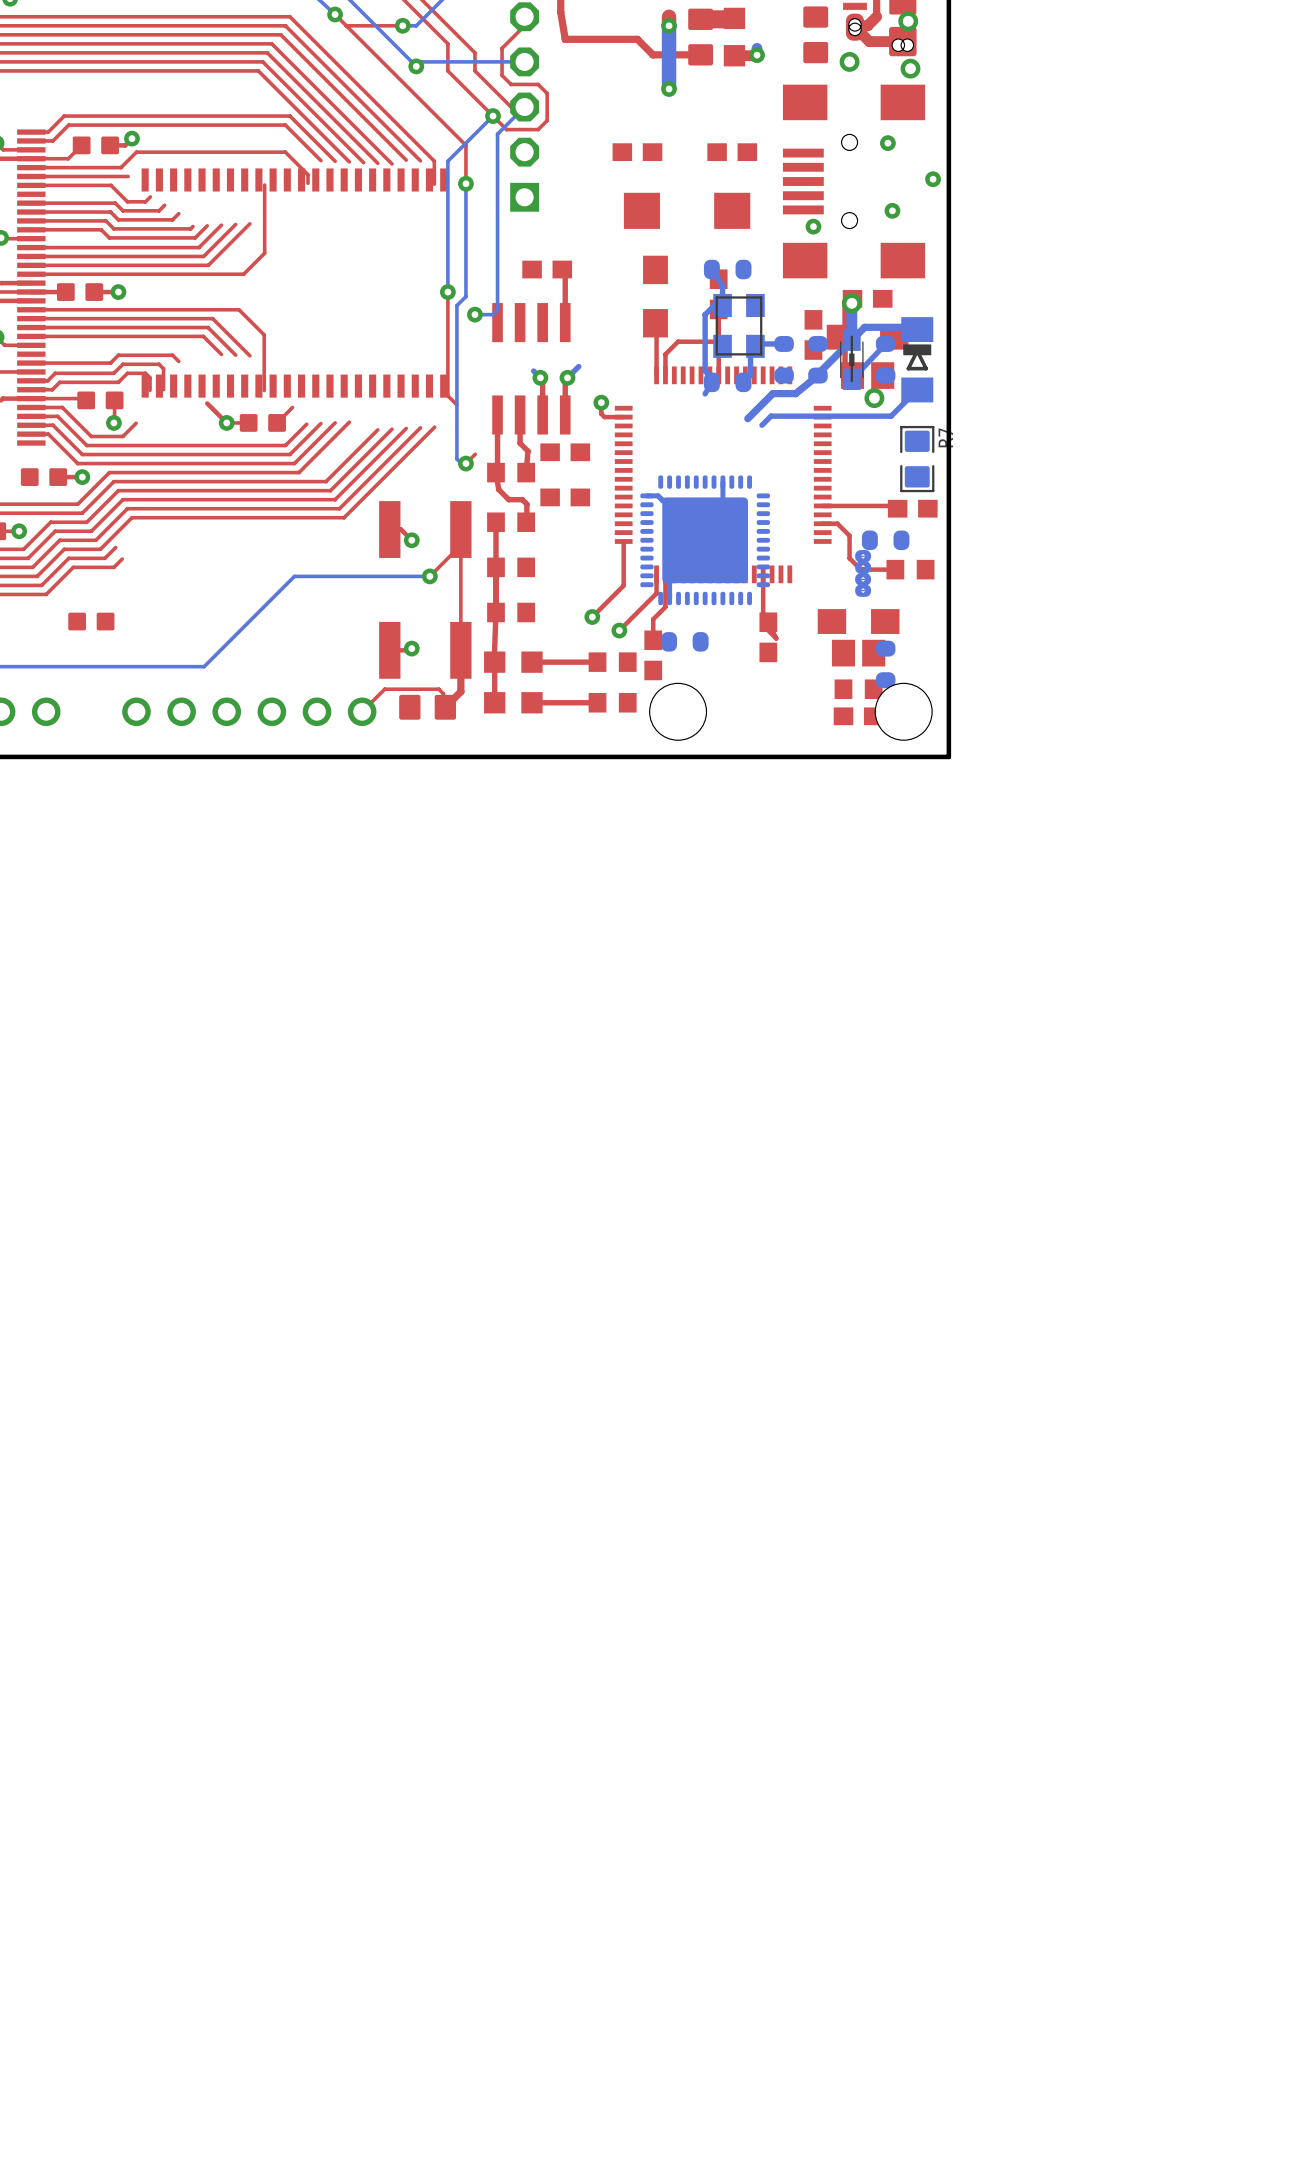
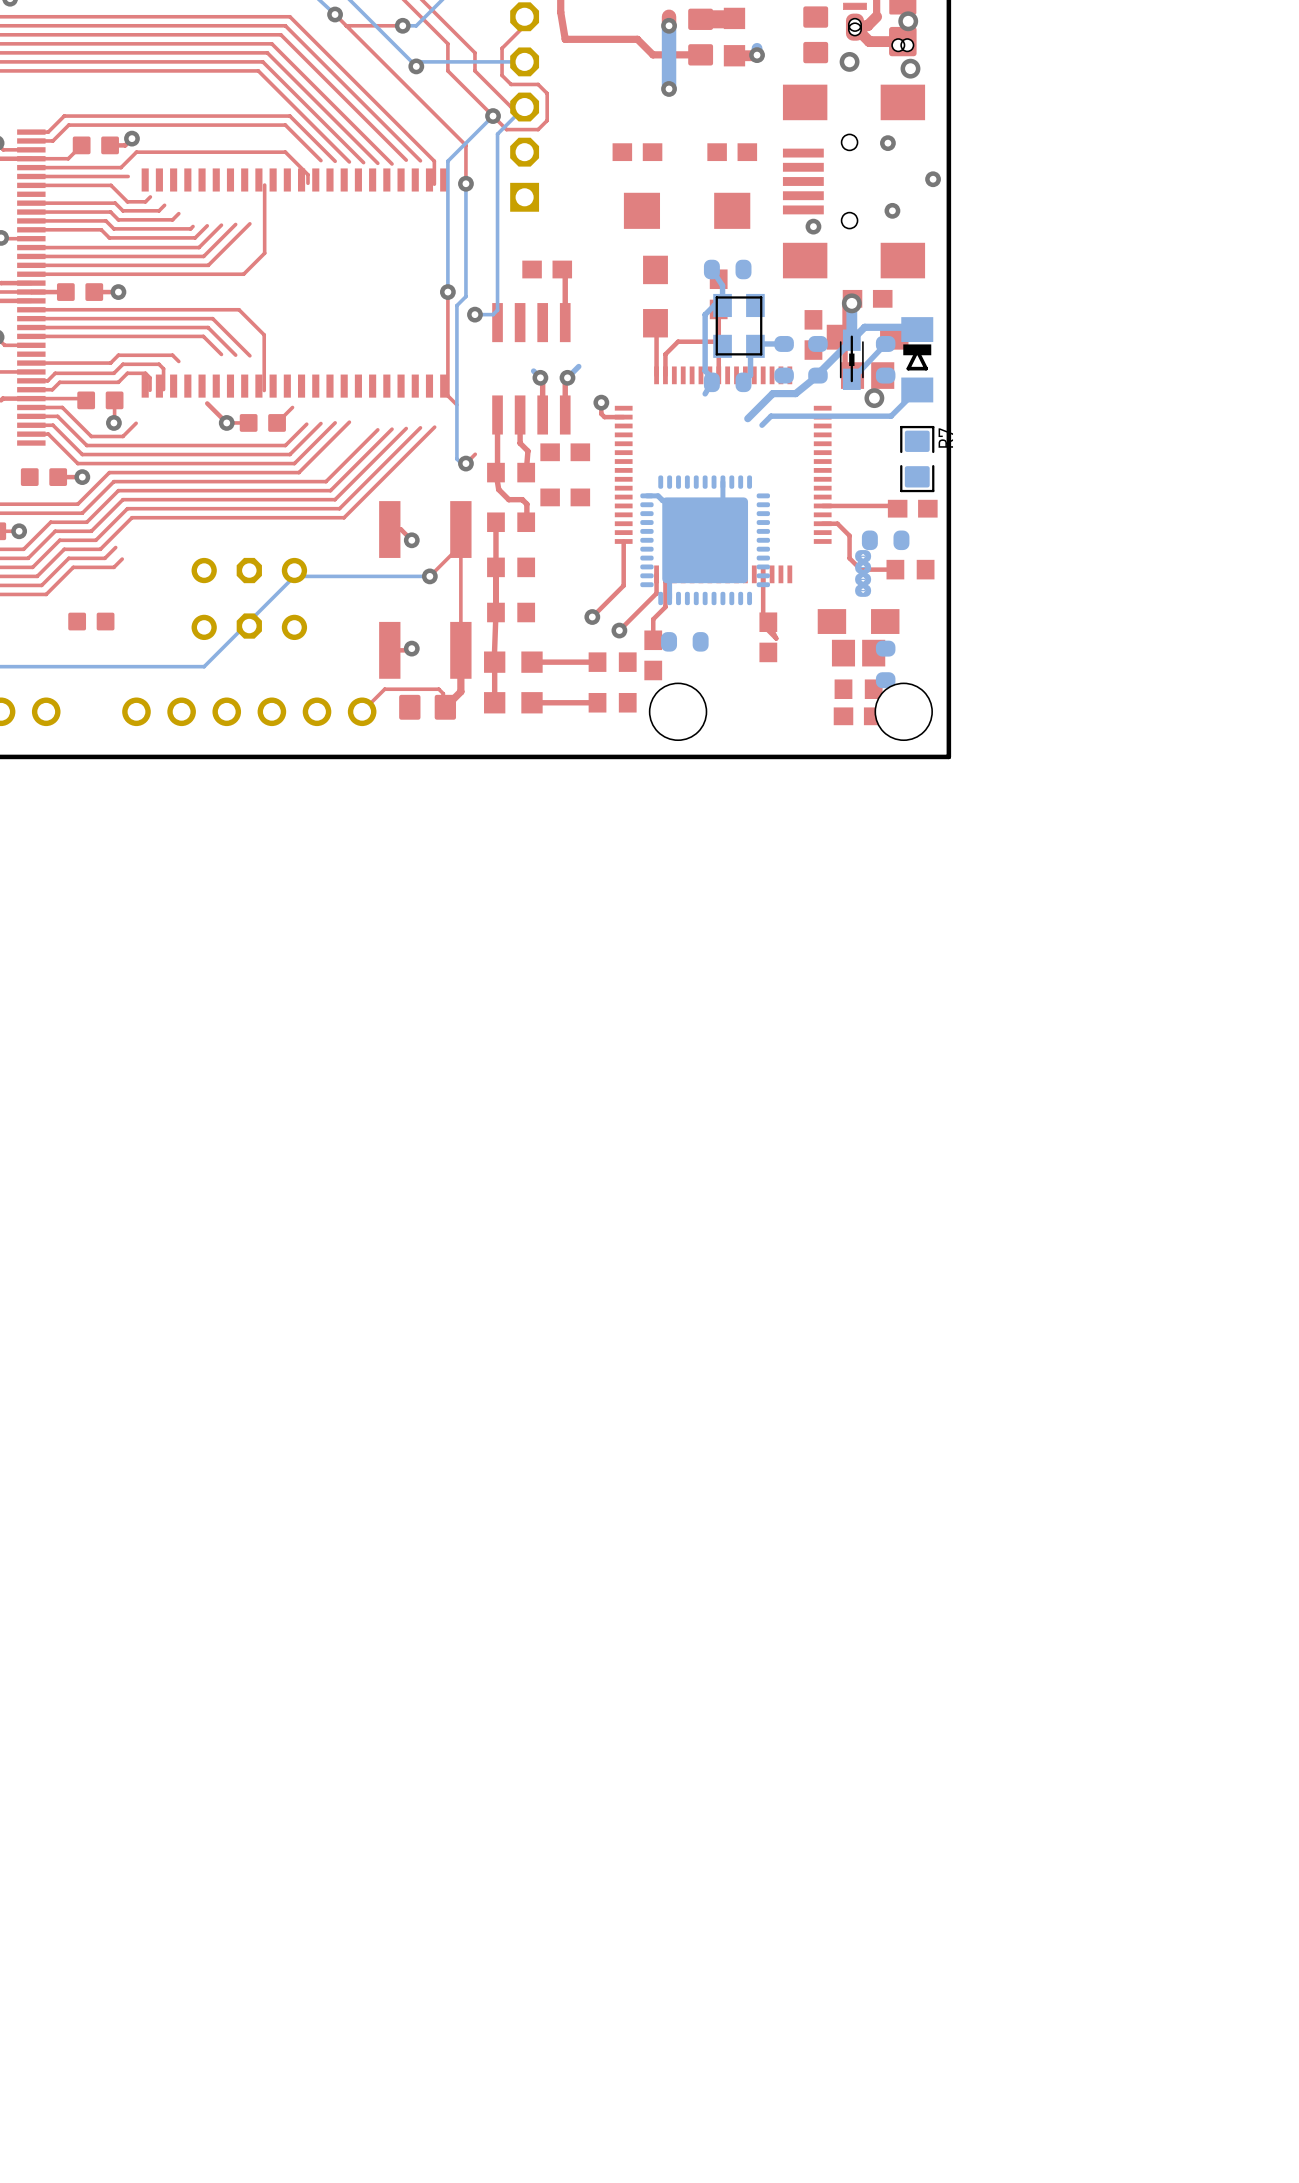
part: none -> (249, 598)

